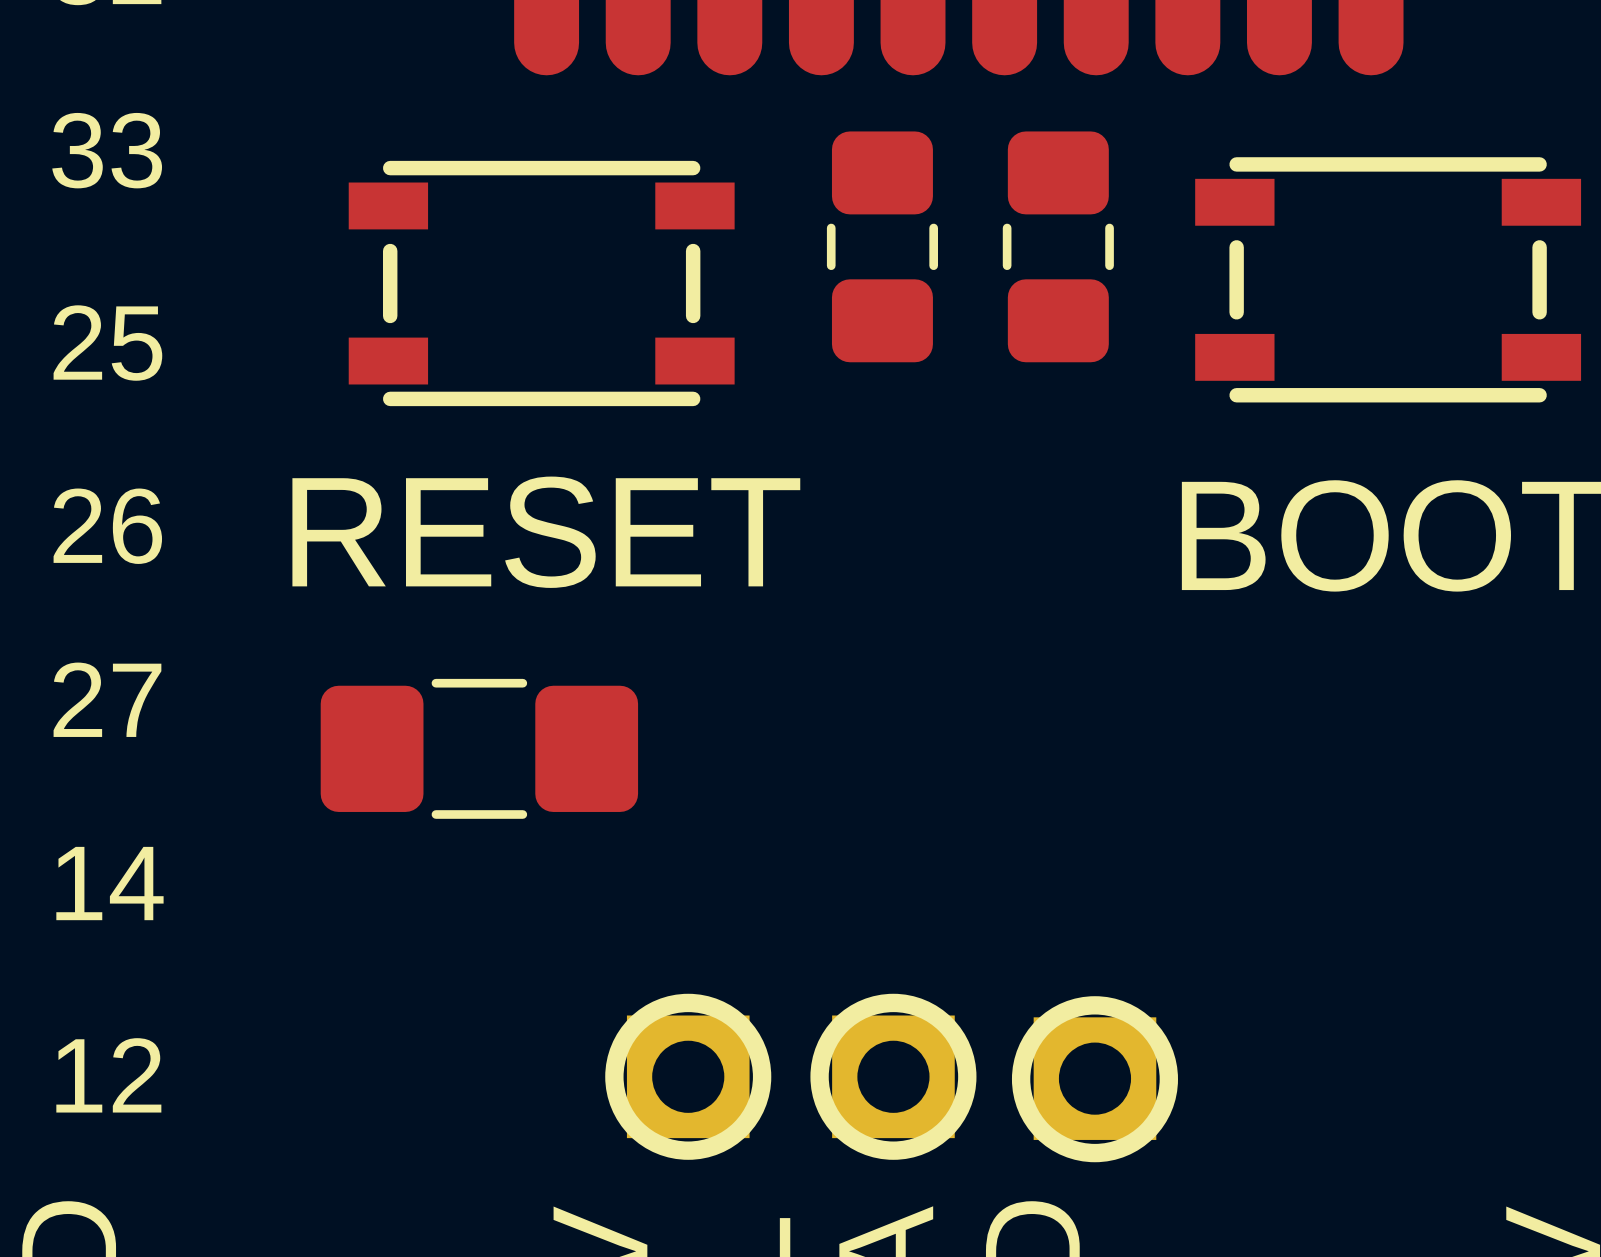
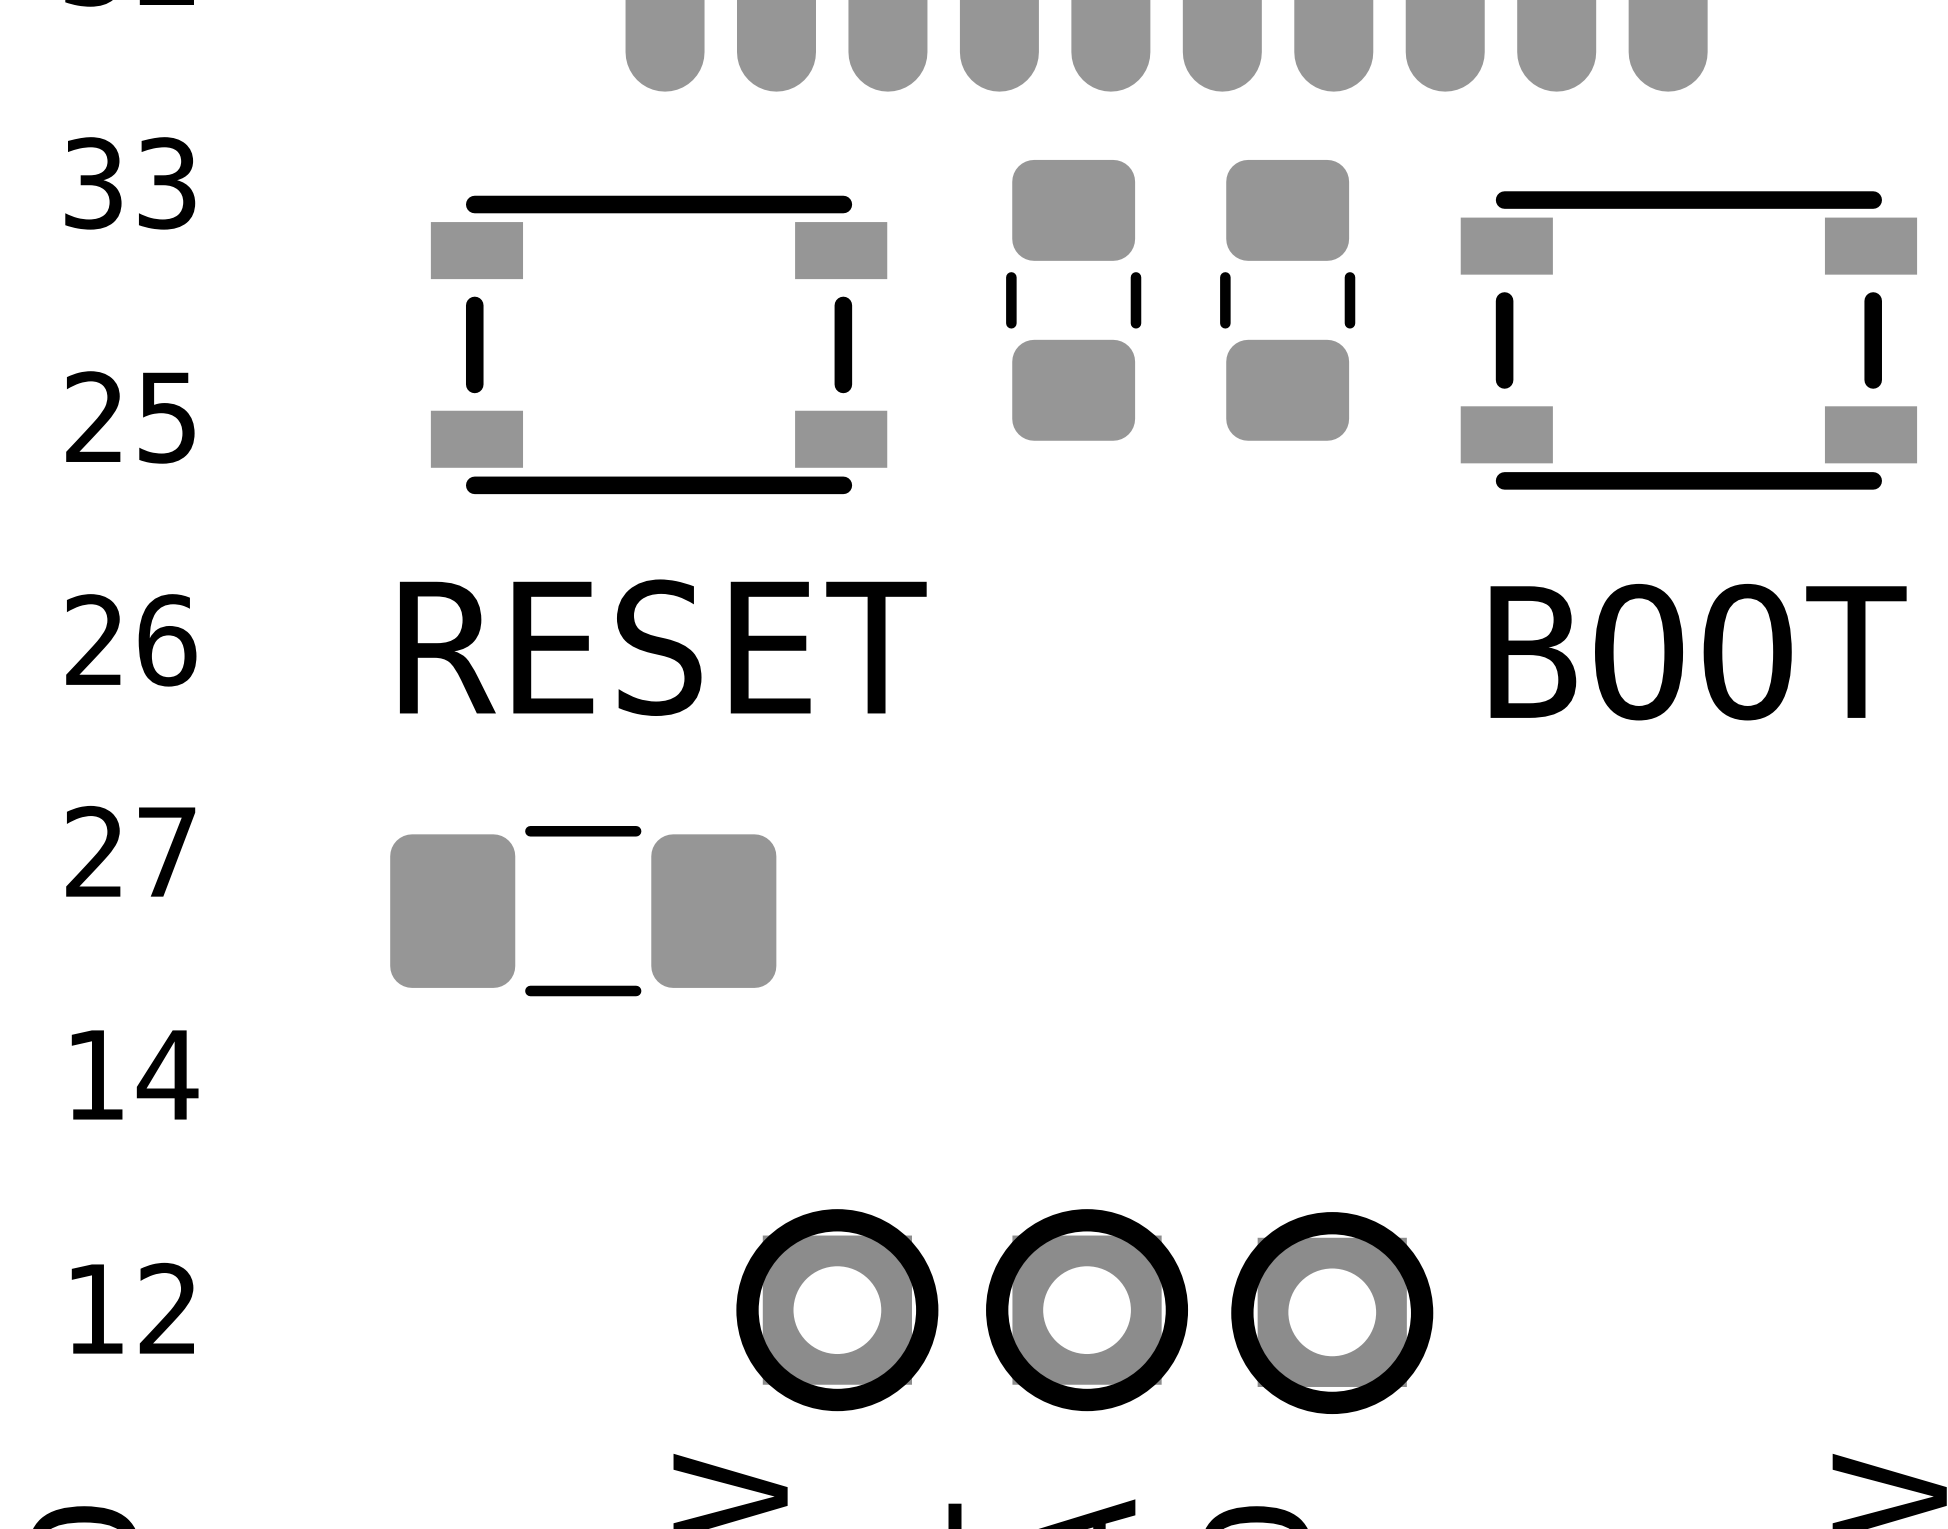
part footprint: [1195, 157, 1582, 403] -> [1460, 191, 1918, 490]
part footprint: [348, 160, 735, 407] -> [430, 195, 888, 495]

